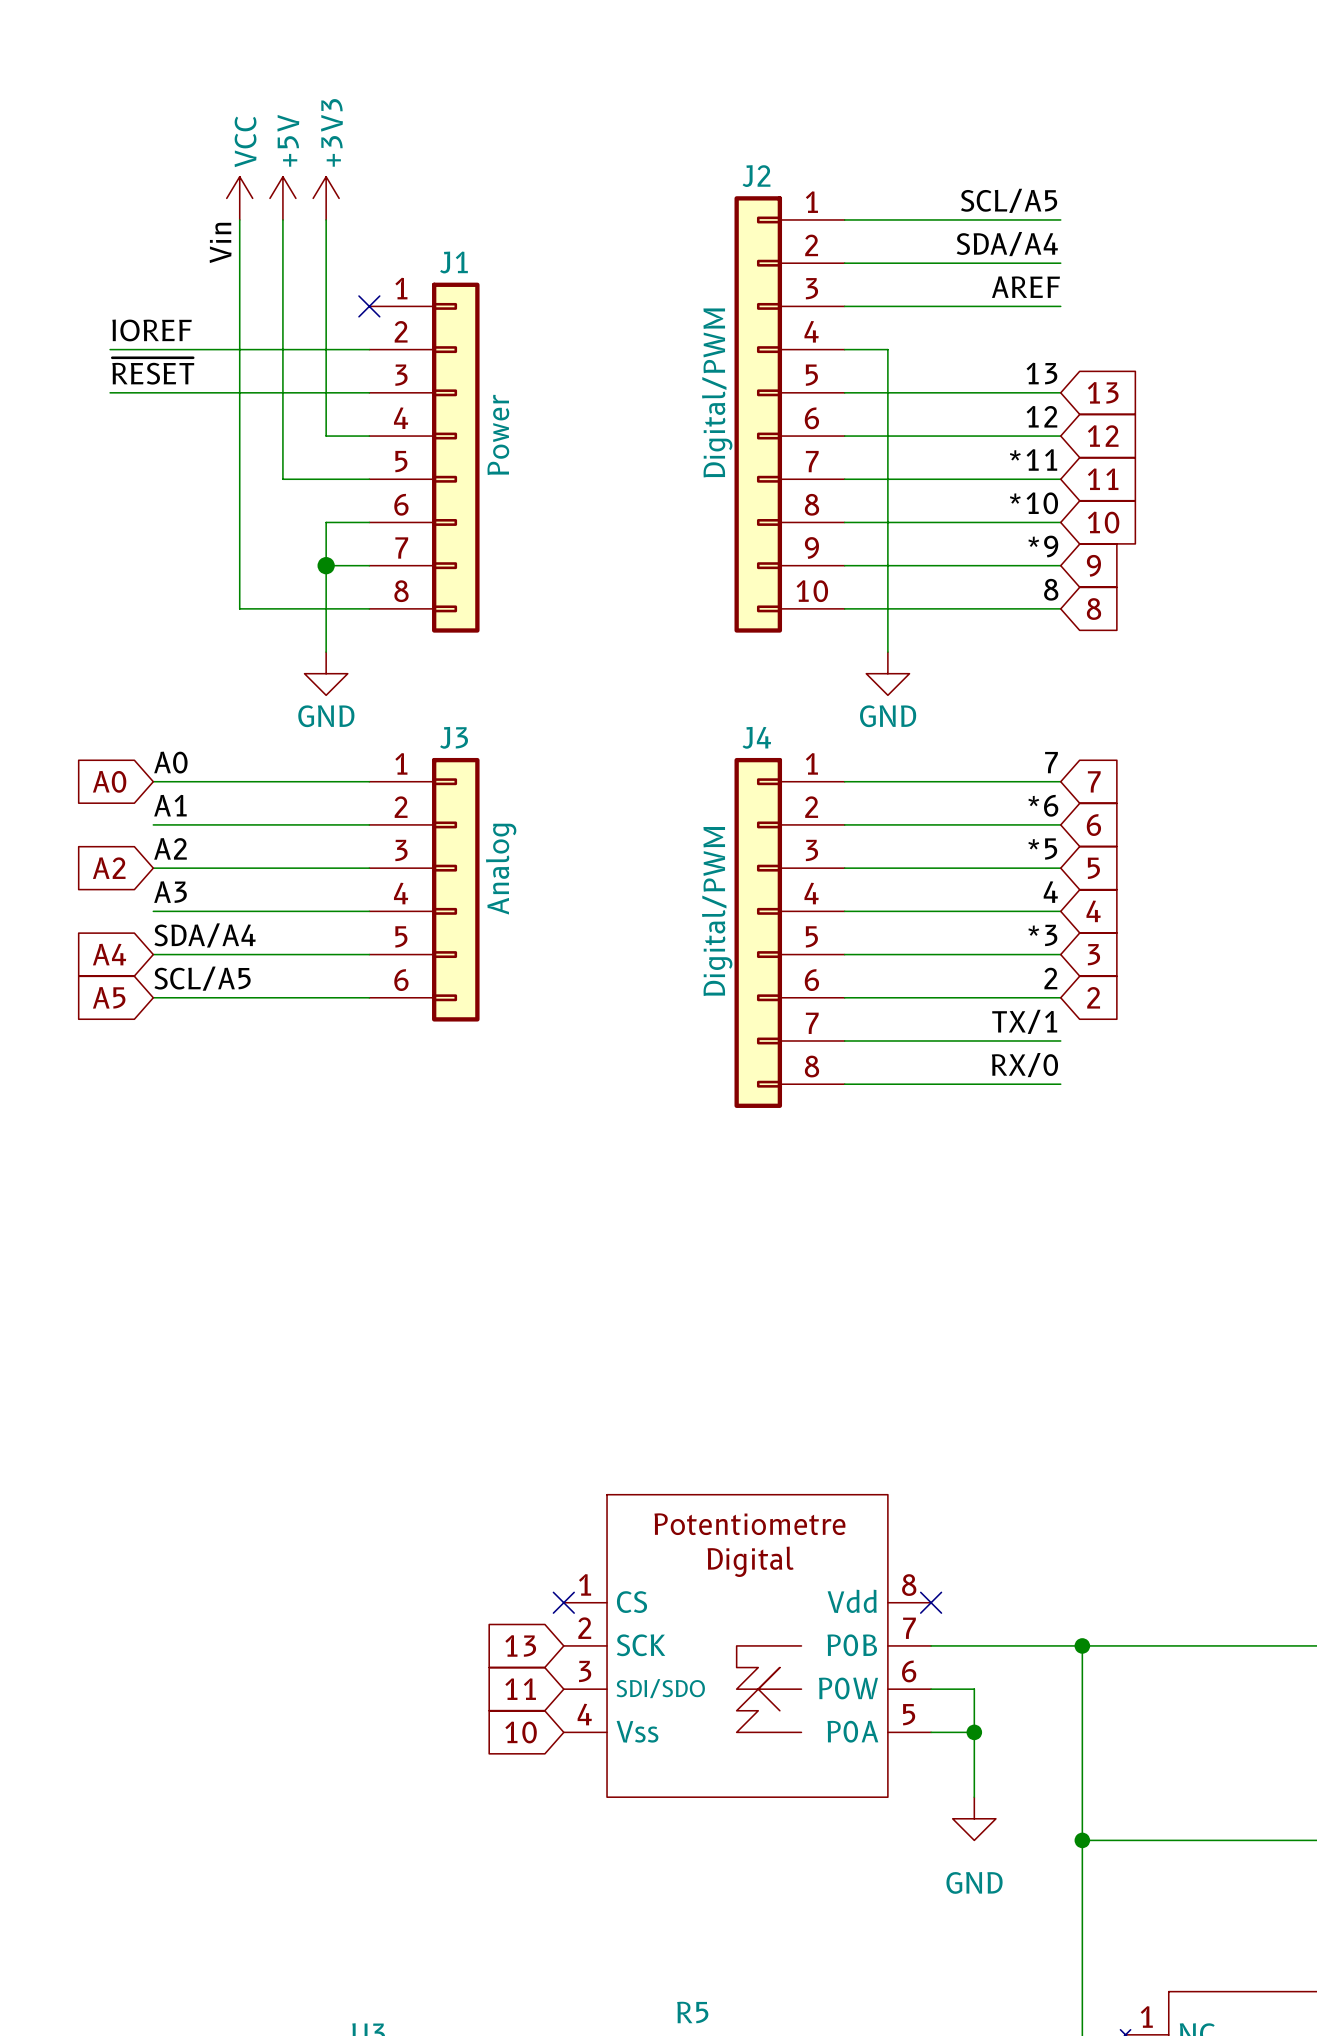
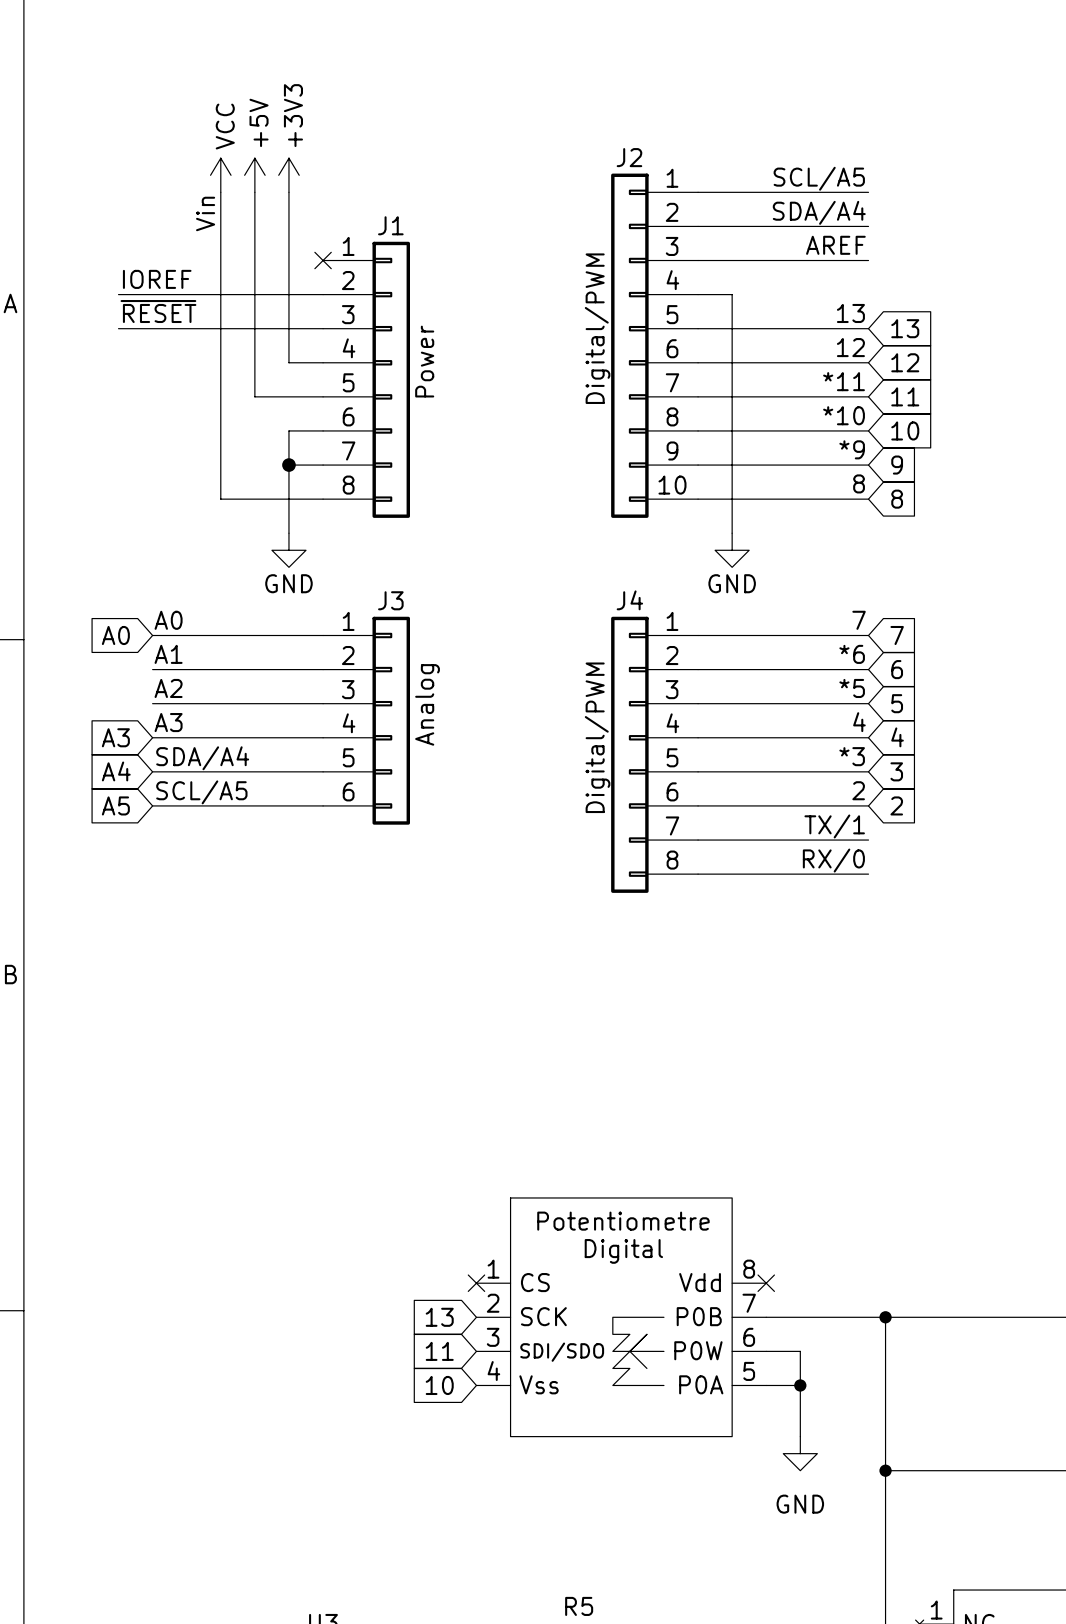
global label: A2 (109, 868) -> none
global label: none -> A3 (115, 737)

